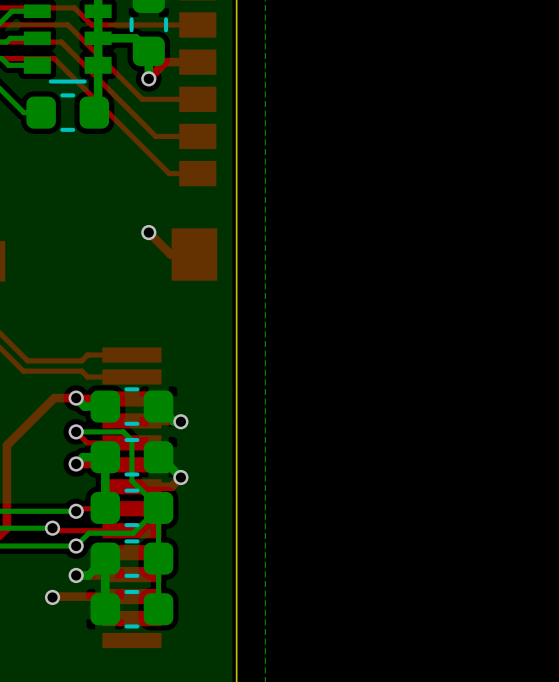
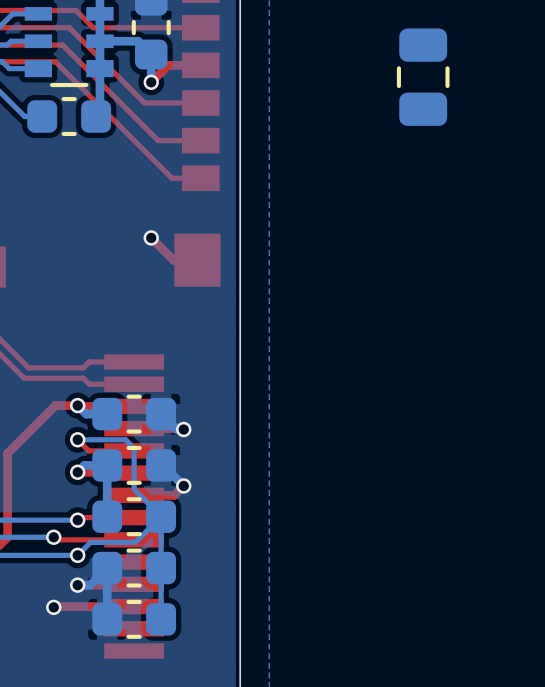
part: none -> (423, 77)

